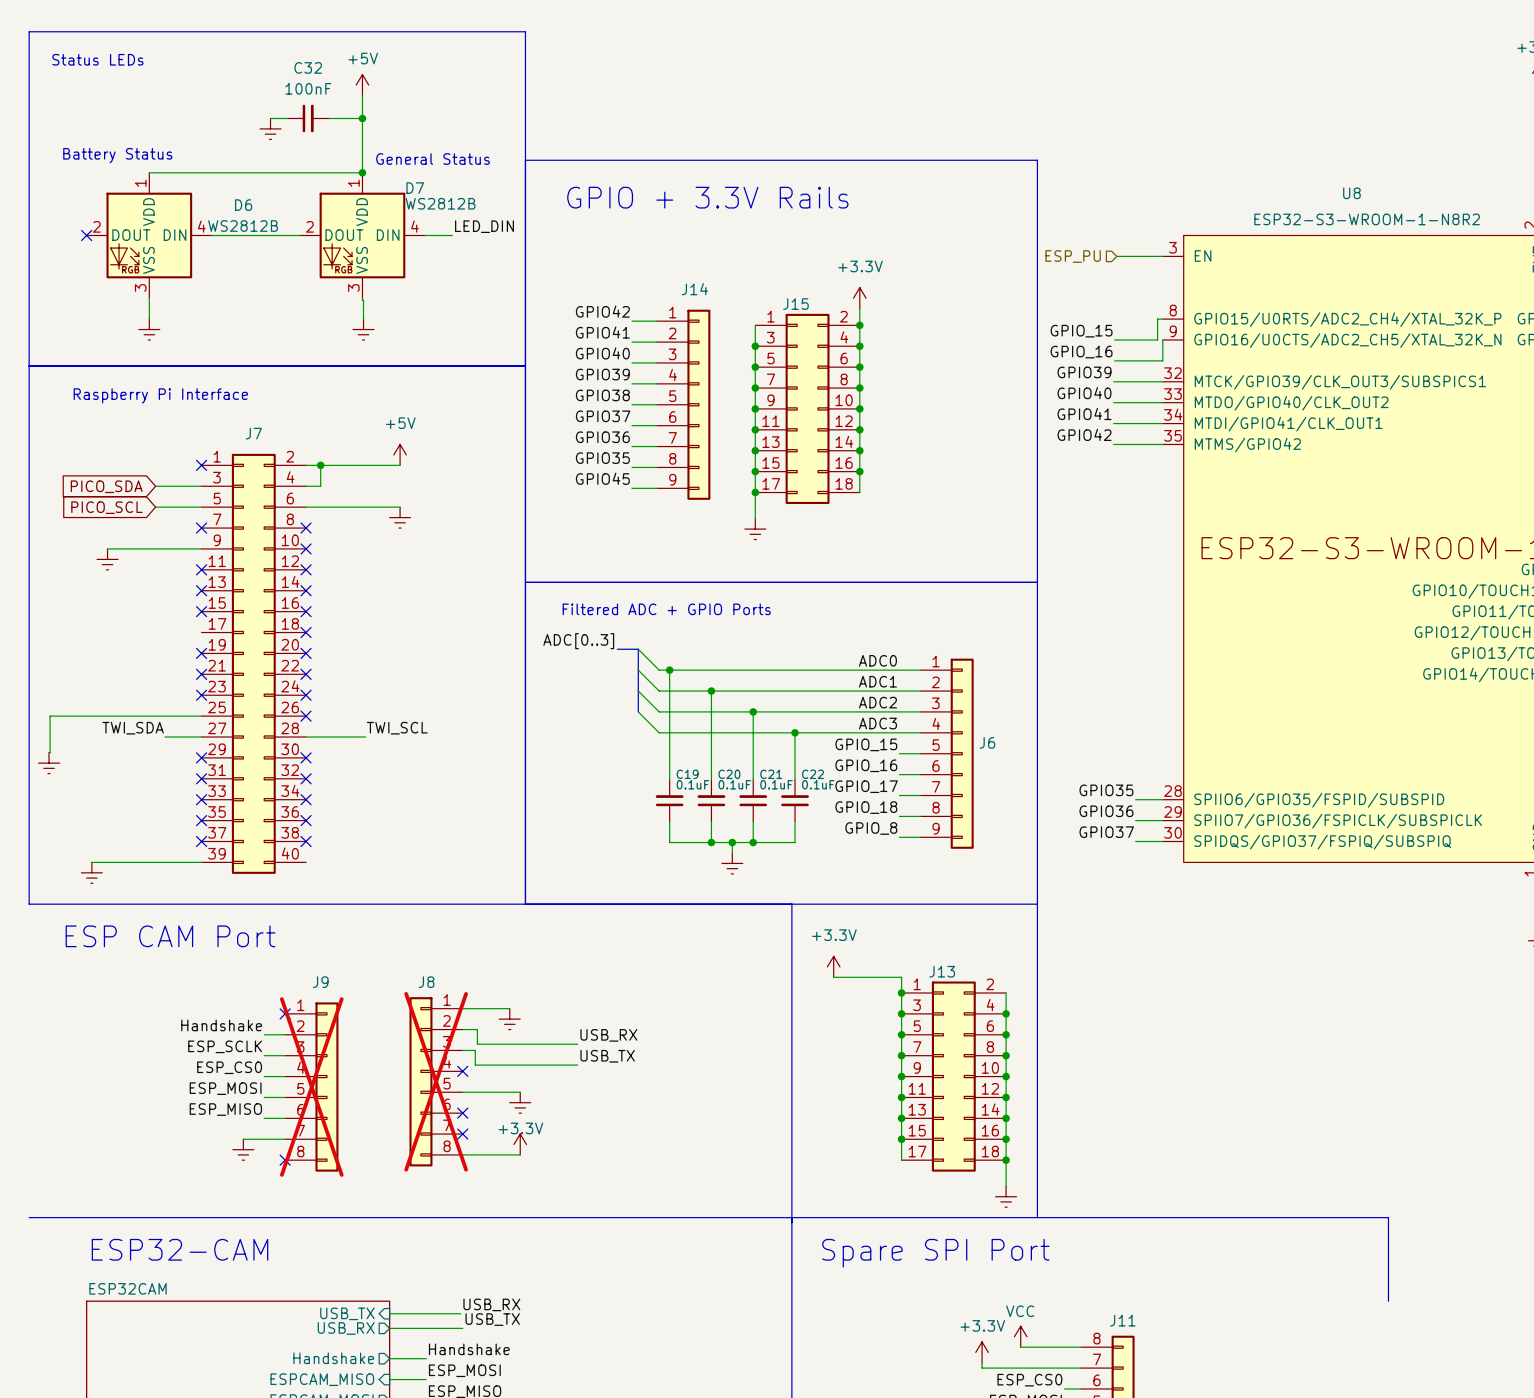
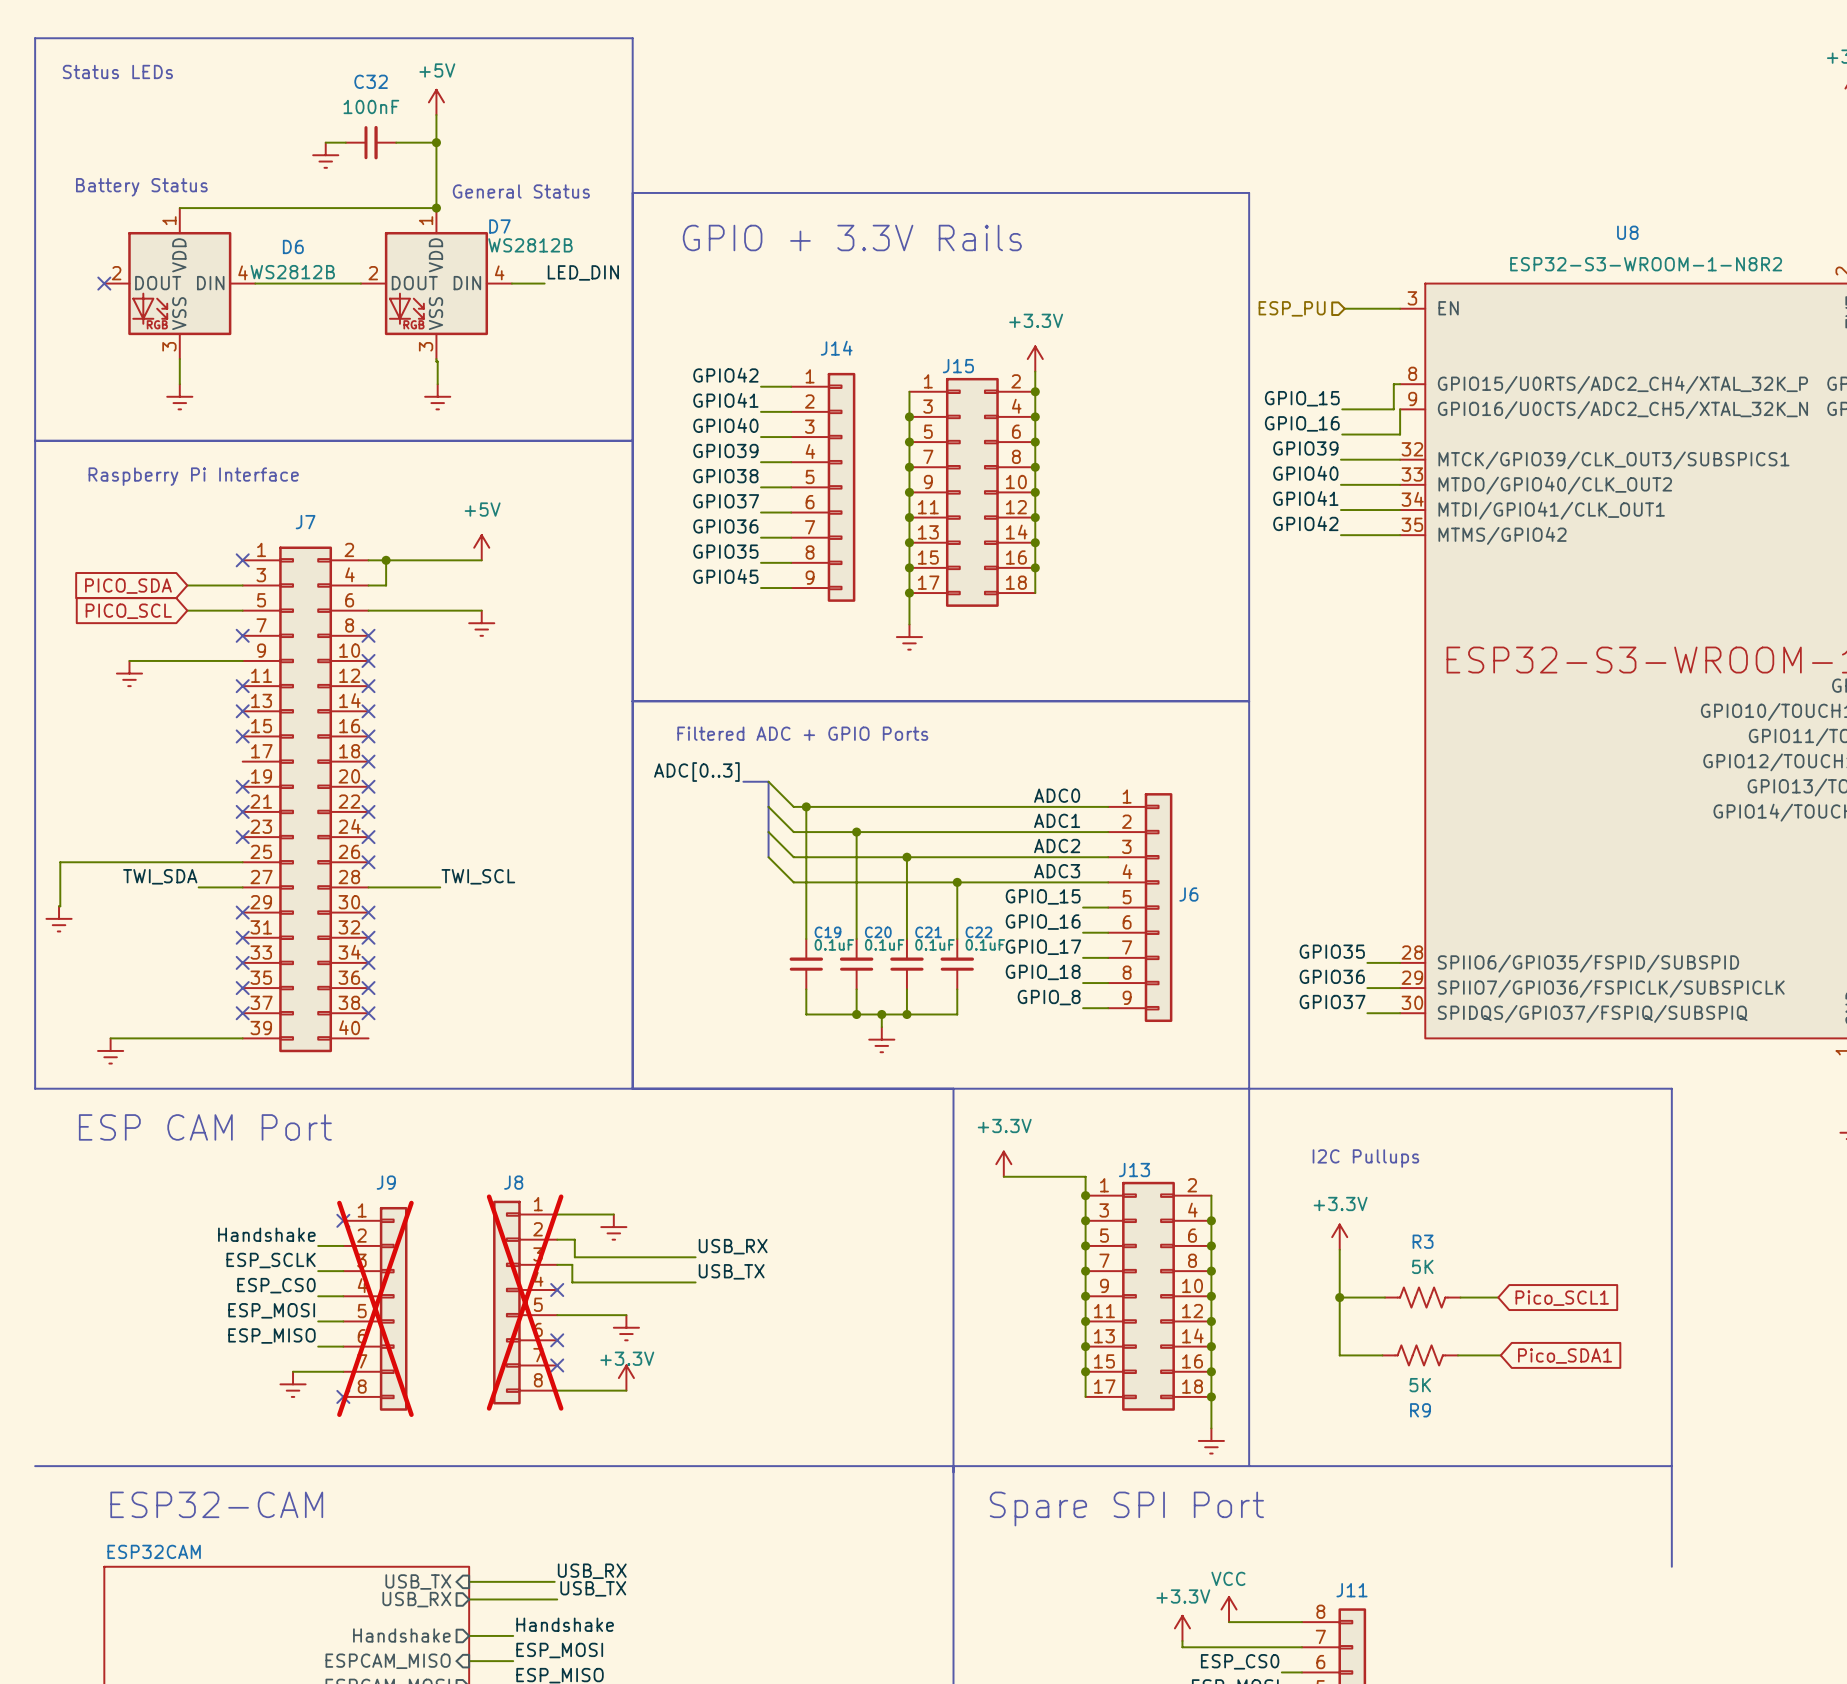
line: none -> (1249, 1088) (1671, 1088) (1671, 1466)
text: none -> I2C Pullups (1365, 1158)
power symbol: none -> +3.3V (1339, 1237)
wire: none -> (1339, 1249) (1339, 1355) (1382, 1355)
wire: none -> (1339, 1297) (1385, 1297)
junction: none -> (1339, 1297)
R3: none -> 5K (1422, 1297)
wire: none -> (1460, 1297) (1498, 1297)
global label: none -> Pico_SCL1 (1562, 1298)
R9: none -> 5K (1420, 1355)
wire: none -> (1457, 1355) (1500, 1355)
global label: none -> Pico_SDA1 (1565, 1356)

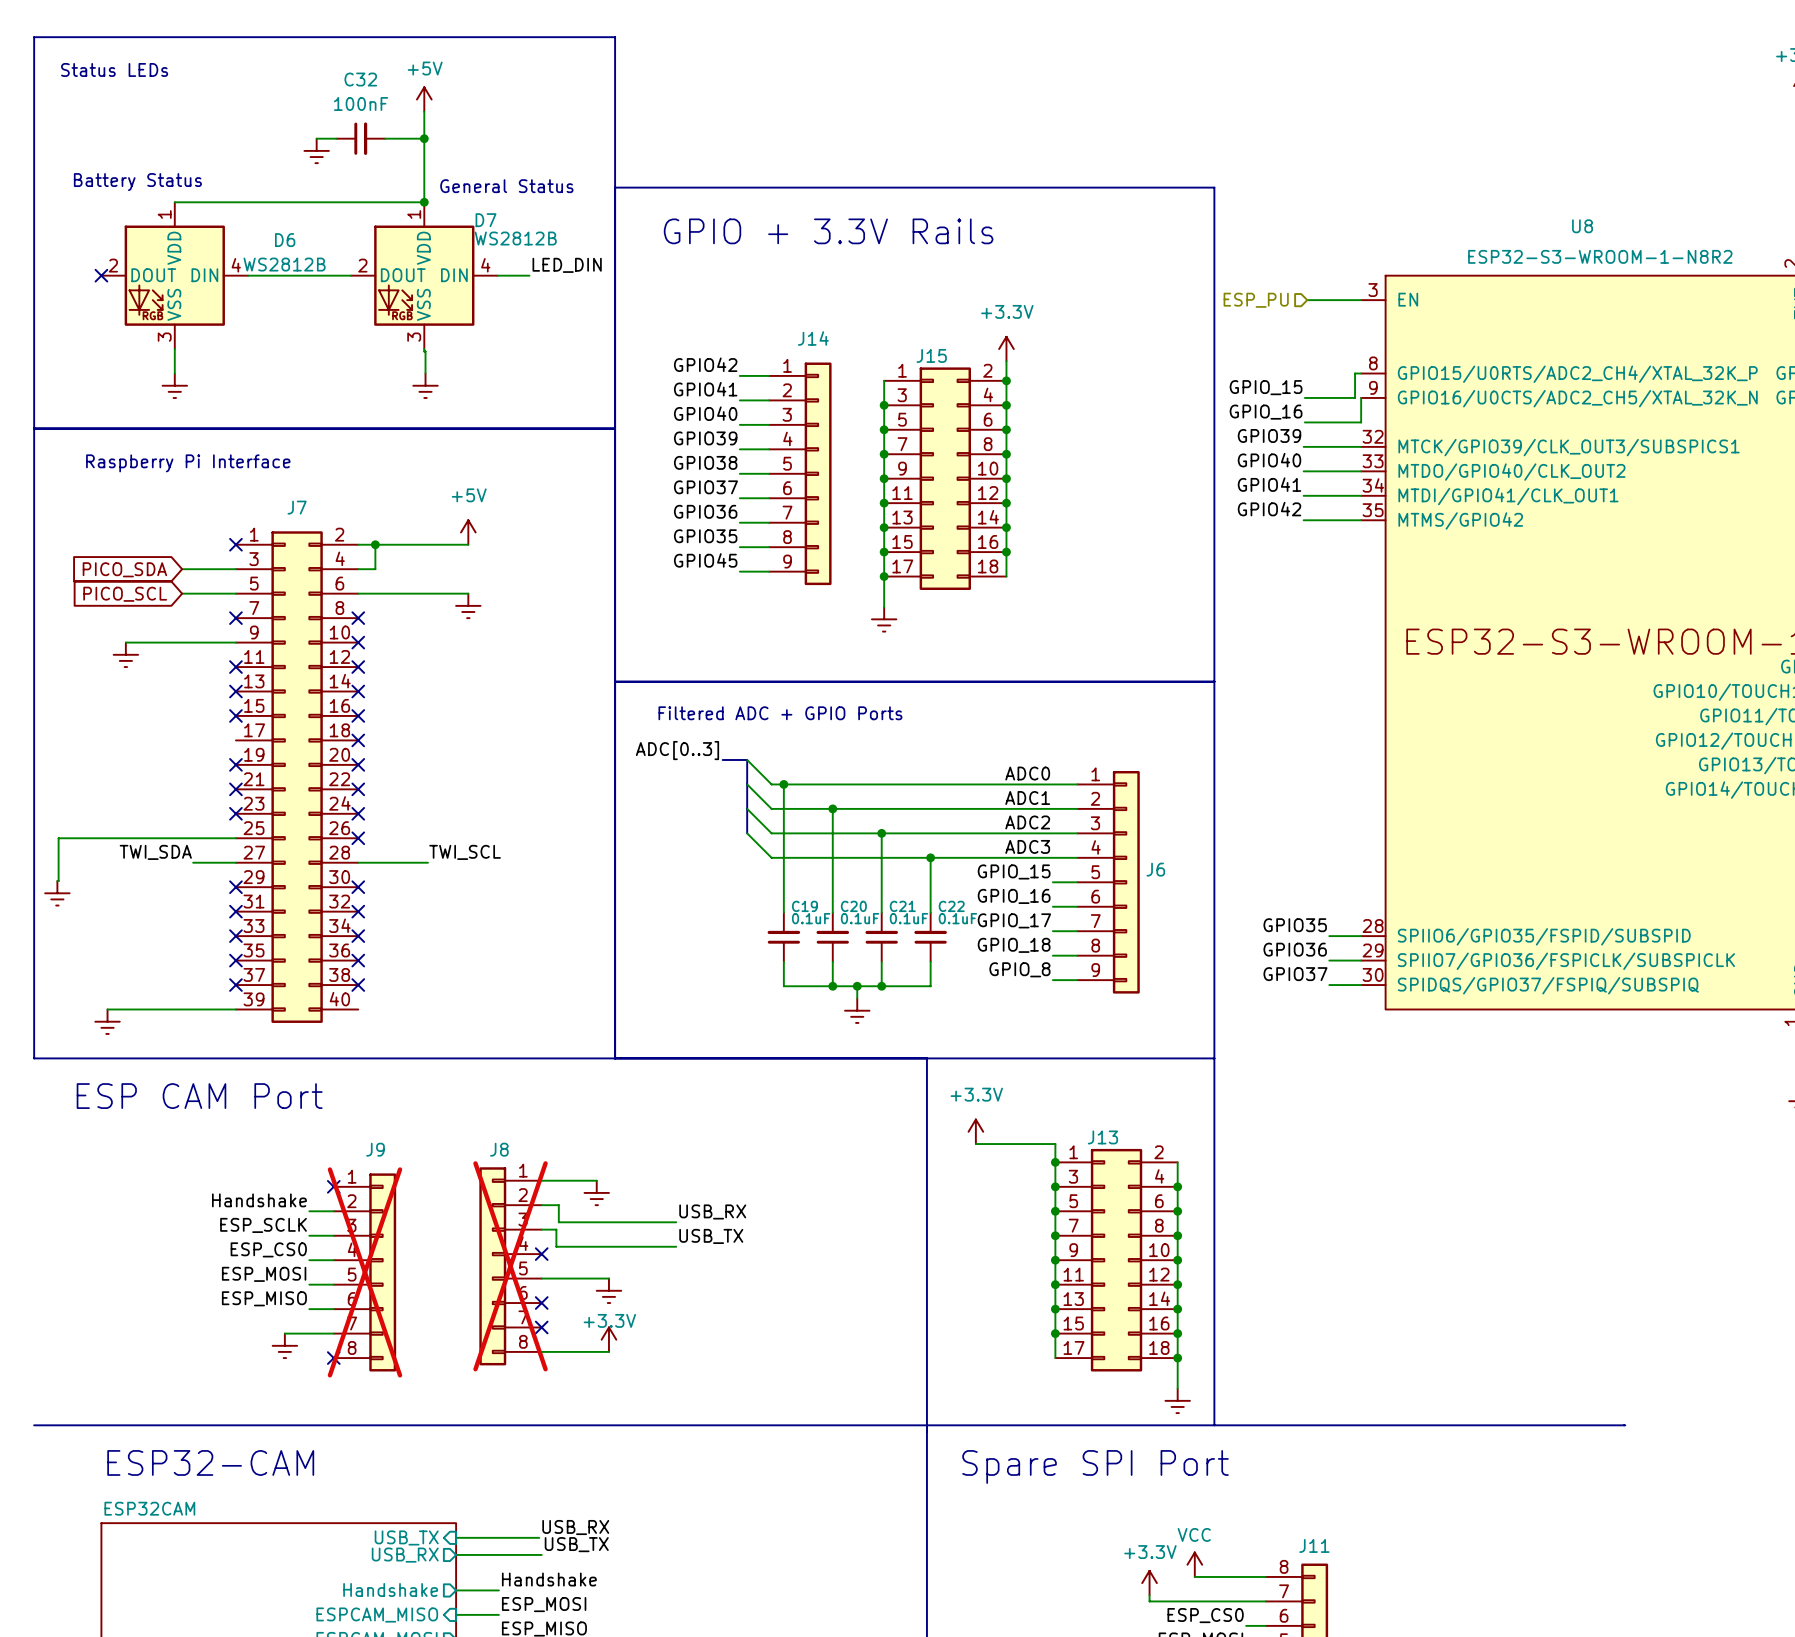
line: (1249, 1088) (1671, 1088) (1671, 1566) -> none
text: I2C Pullups (1365, 1158) -> none
power symbol: +3.3V (1339, 1237) -> none
wire: (1339, 1249) (1339, 1355) (1382, 1355) -> none
wire: (1339, 1297) (1385, 1297) -> none
junction: (1339, 1297) -> none
R3: 5K (1422, 1297) -> none
wire: (1460, 1297) (1498, 1297) -> none
global label: Pico_SCL1 (1562, 1298) -> none
R9: 5K (1420, 1355) -> none
wire: (1457, 1355) (1500, 1355) -> none
global label: Pico_SDA1 (1565, 1356) -> none

